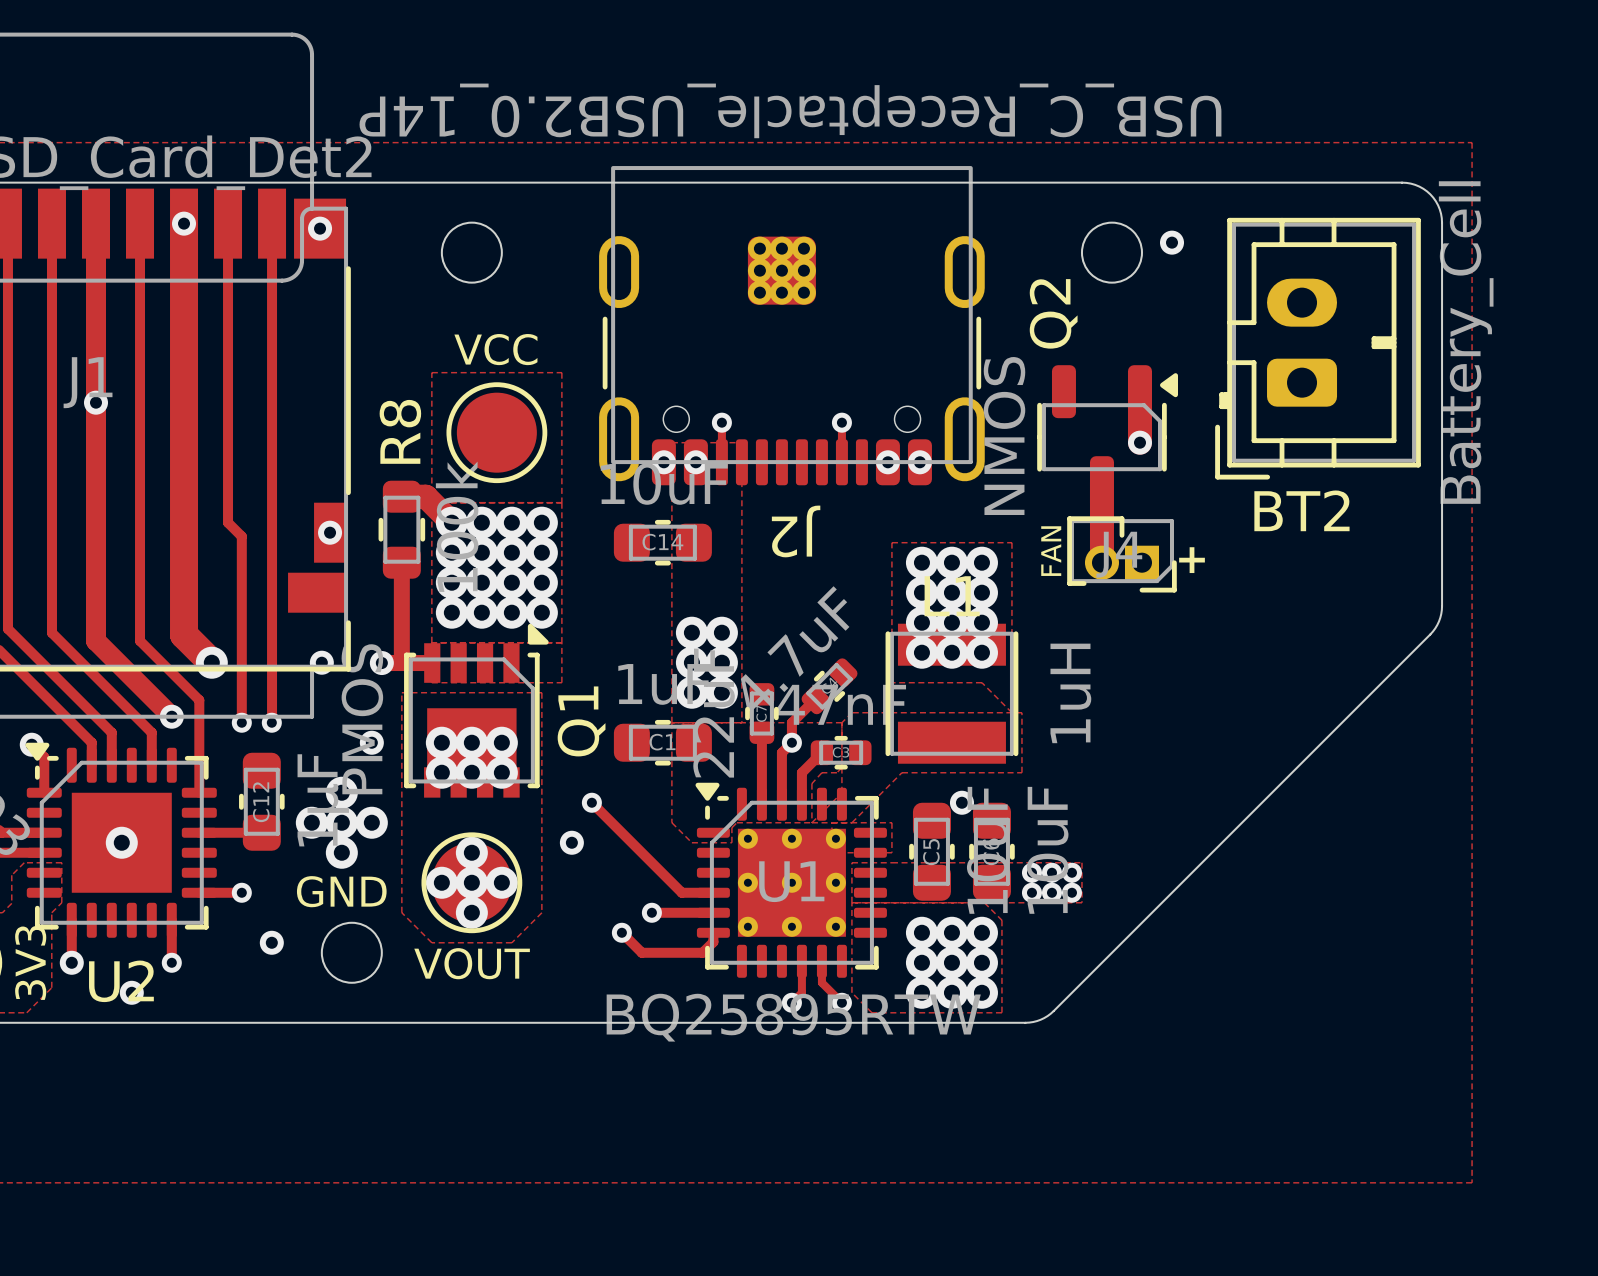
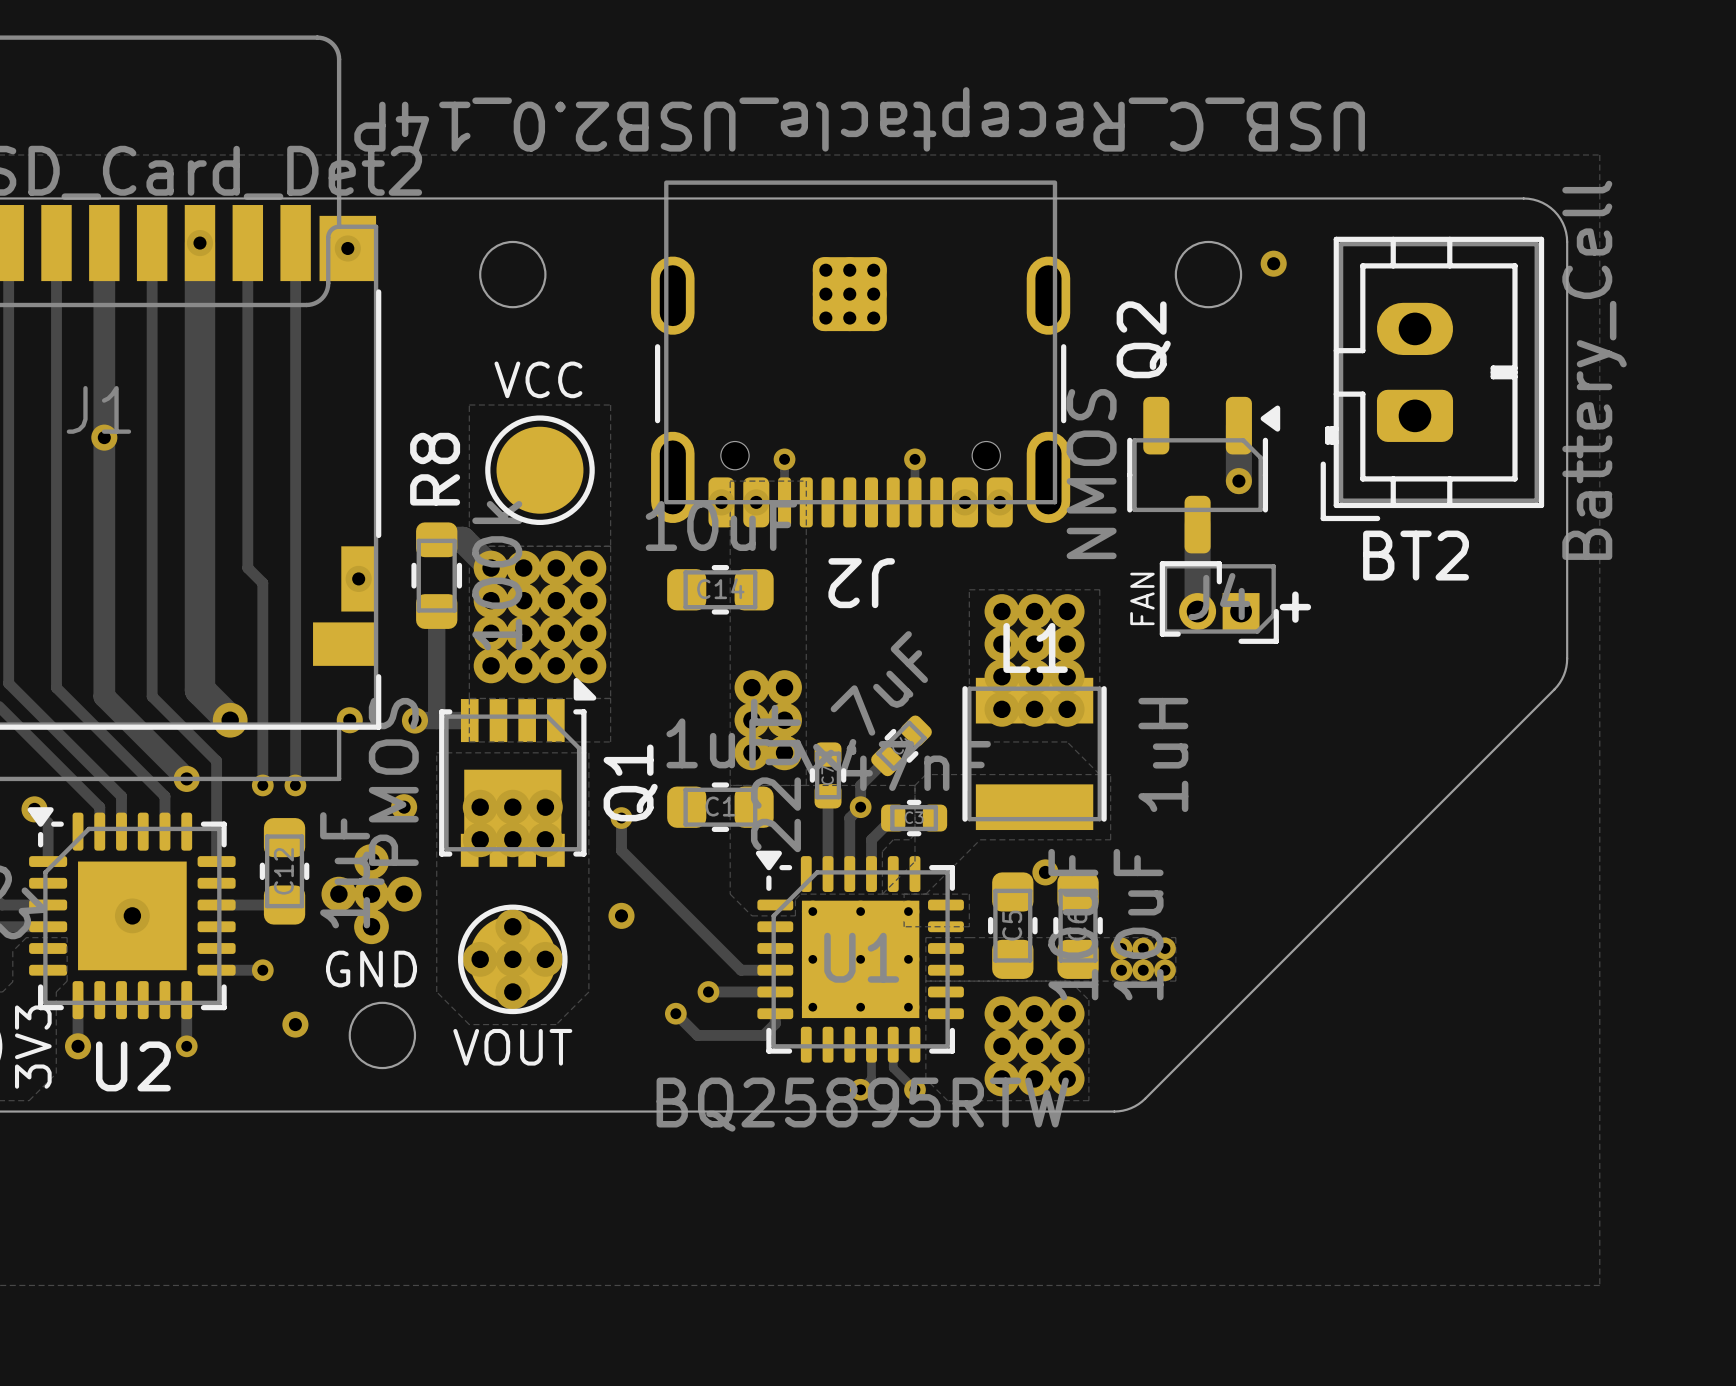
track: none -> (621, 818) (621, 850) (643, 872)
via position: (591, 802) -> (621, 818)
via: (131, 992) -> none

